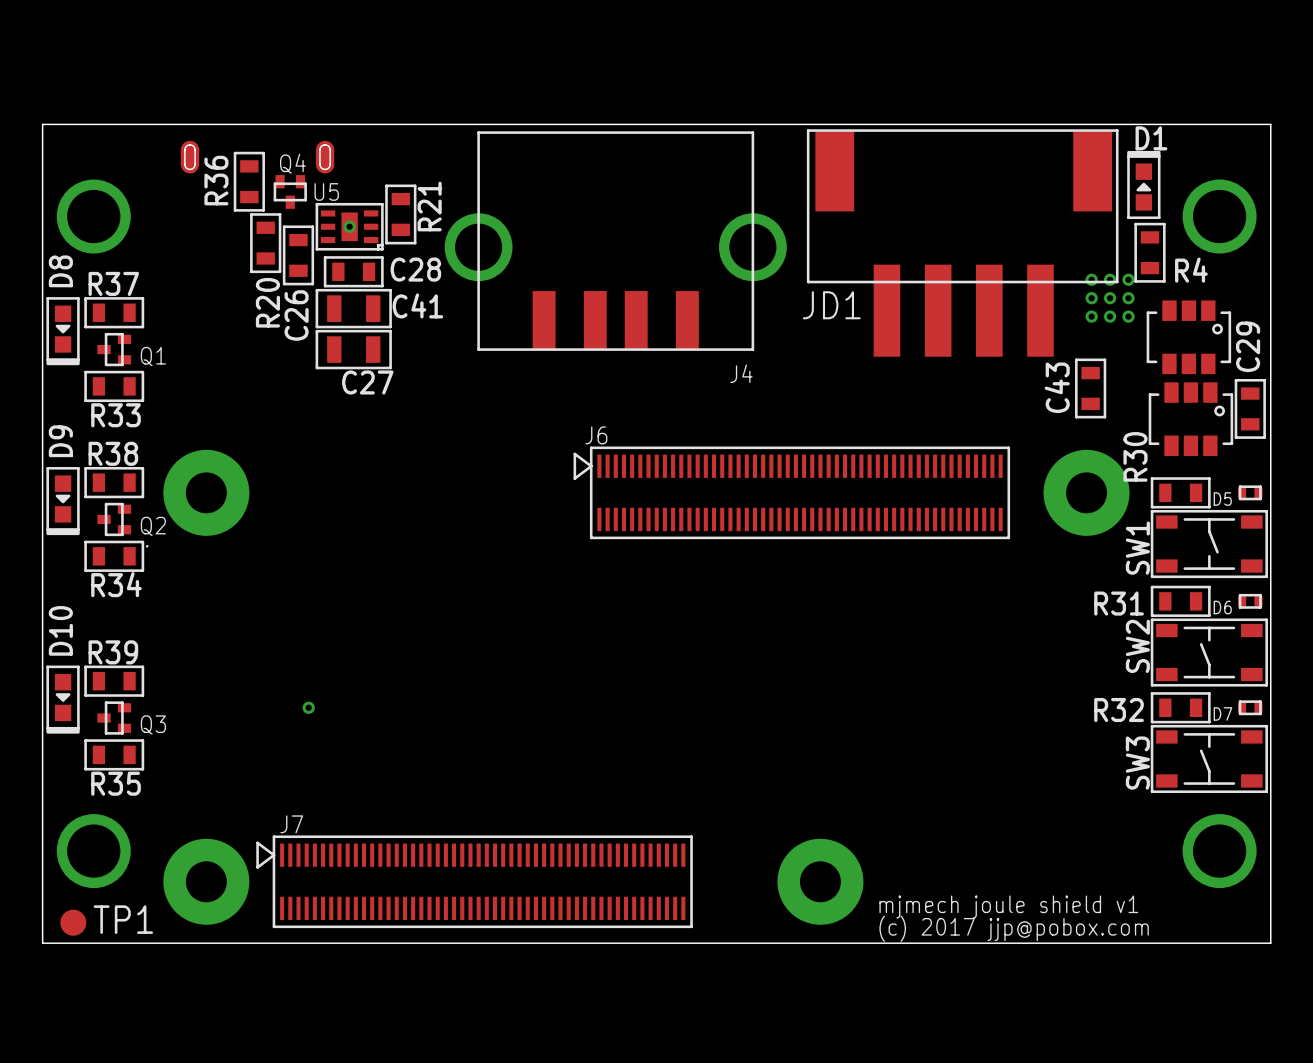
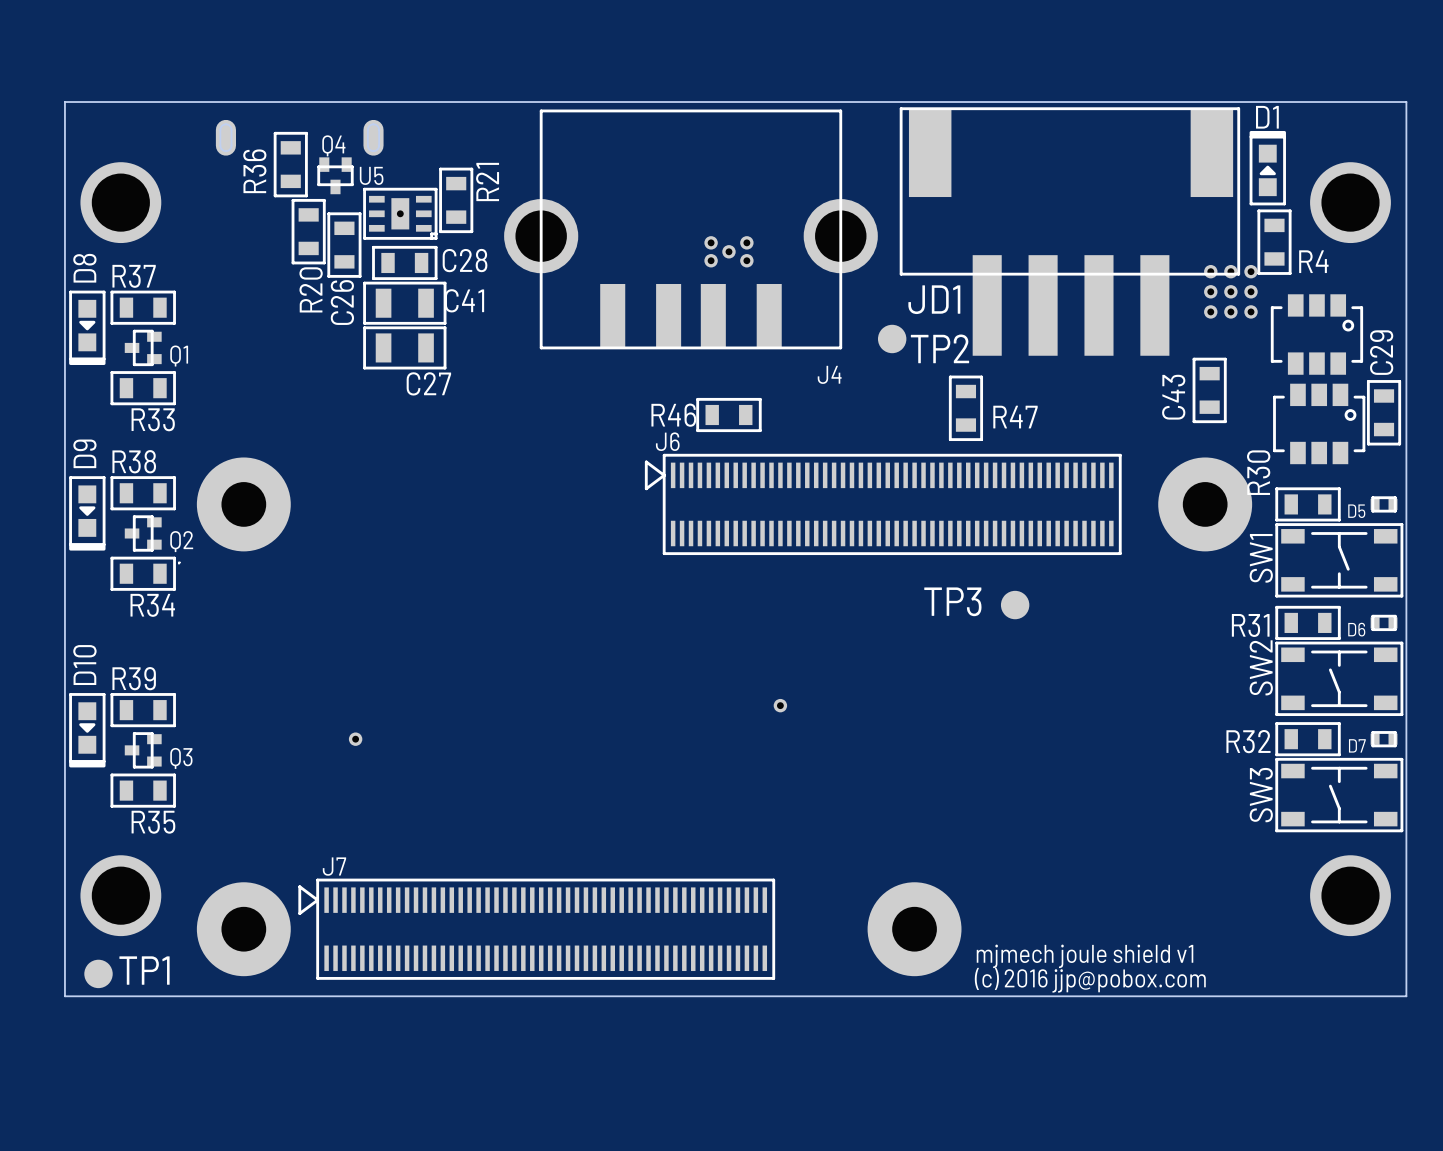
part: none -> (728, 251)
TP2: none -> (892, 338)
R47: none -> (965, 408)
R46: none -> (728, 415)
TP3: none -> (1015, 605)
part: none -> (780, 705)
text: (c) 2017 jjp@pobox.com (1014, 928) -> (c) 2016 jjp@pobox.com (1090, 980)

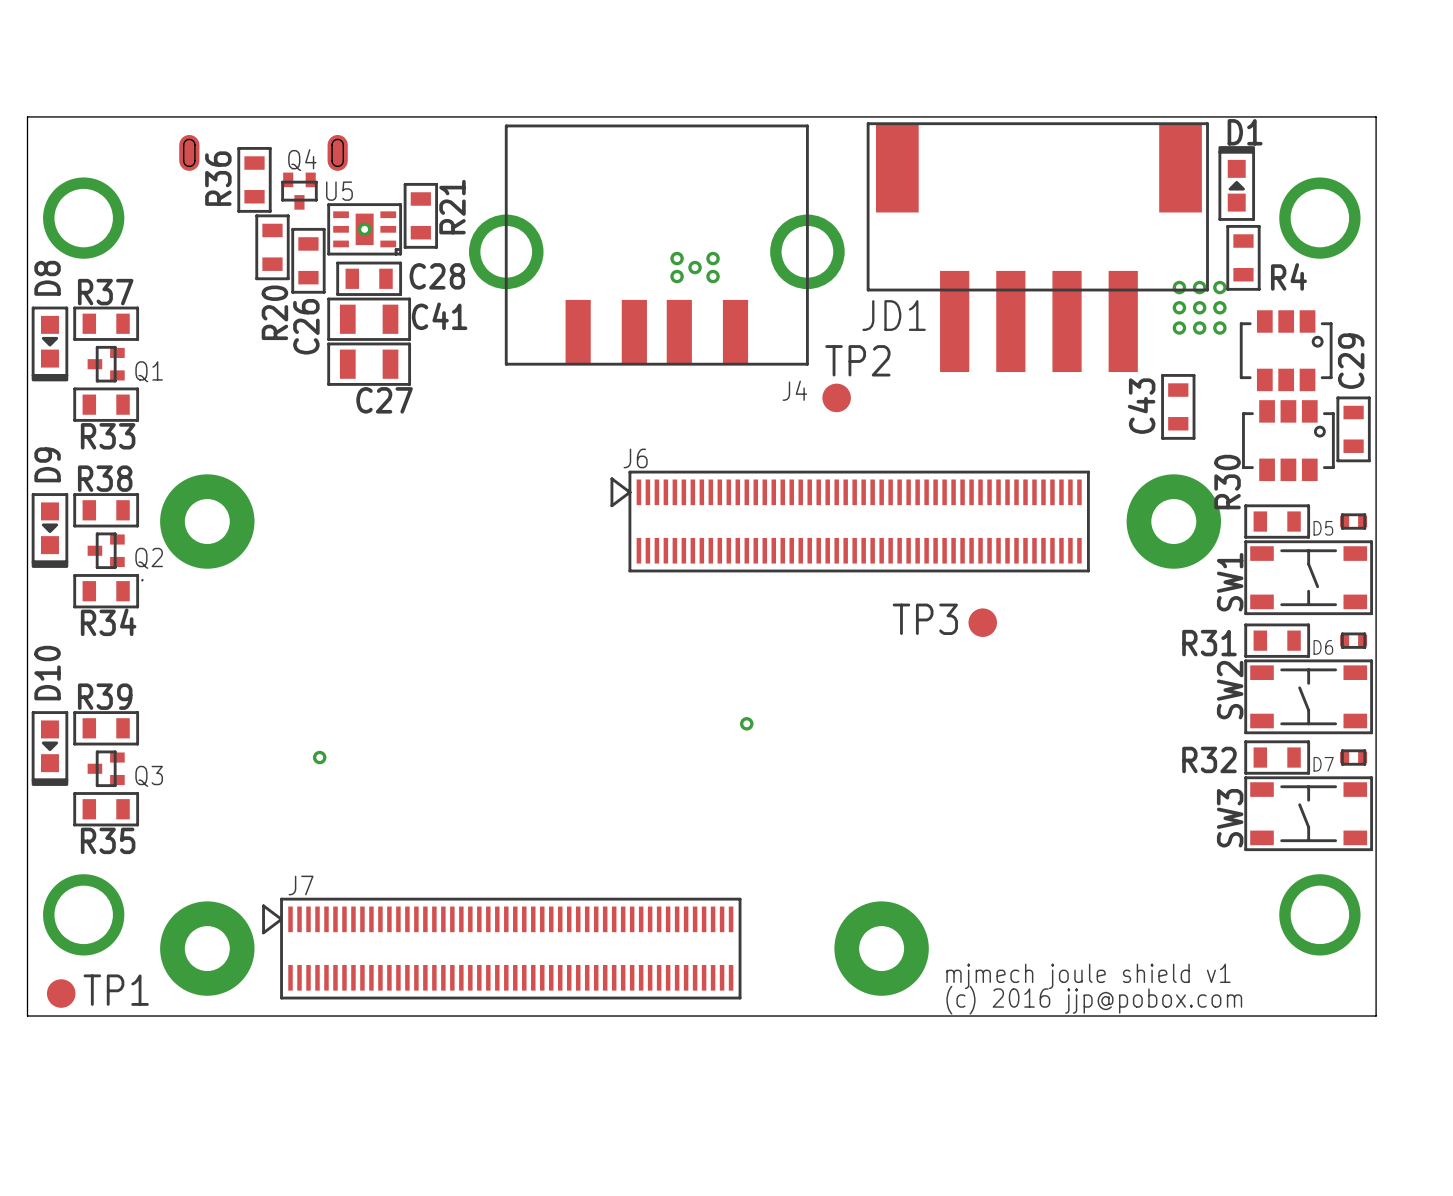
TP2 position: (892, 338) -> (836, 397)
TP2 name position: TP2 (939, 348) -> TP2 (857, 360)
R47: (965, 408) -> none
R46: (728, 415) -> none

